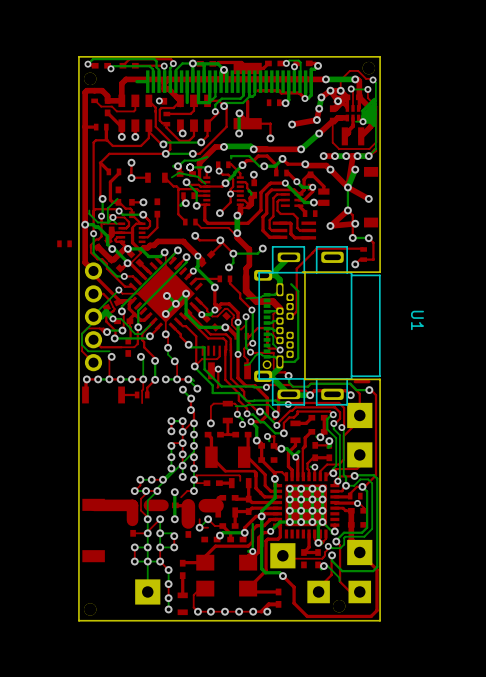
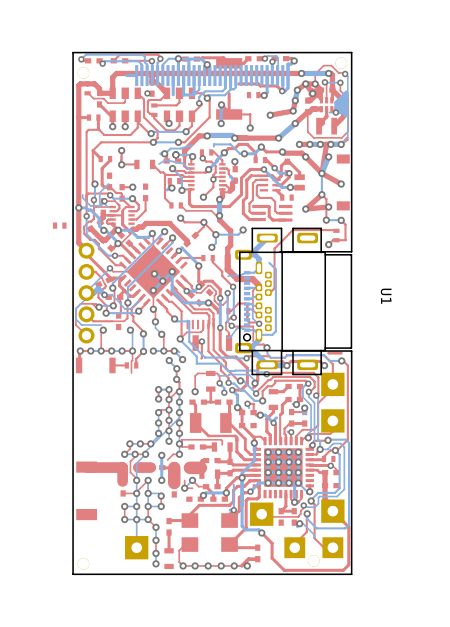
bottom track: (197, 256) (197, 266) (193, 271) -> none
via: (197, 256) -> none

